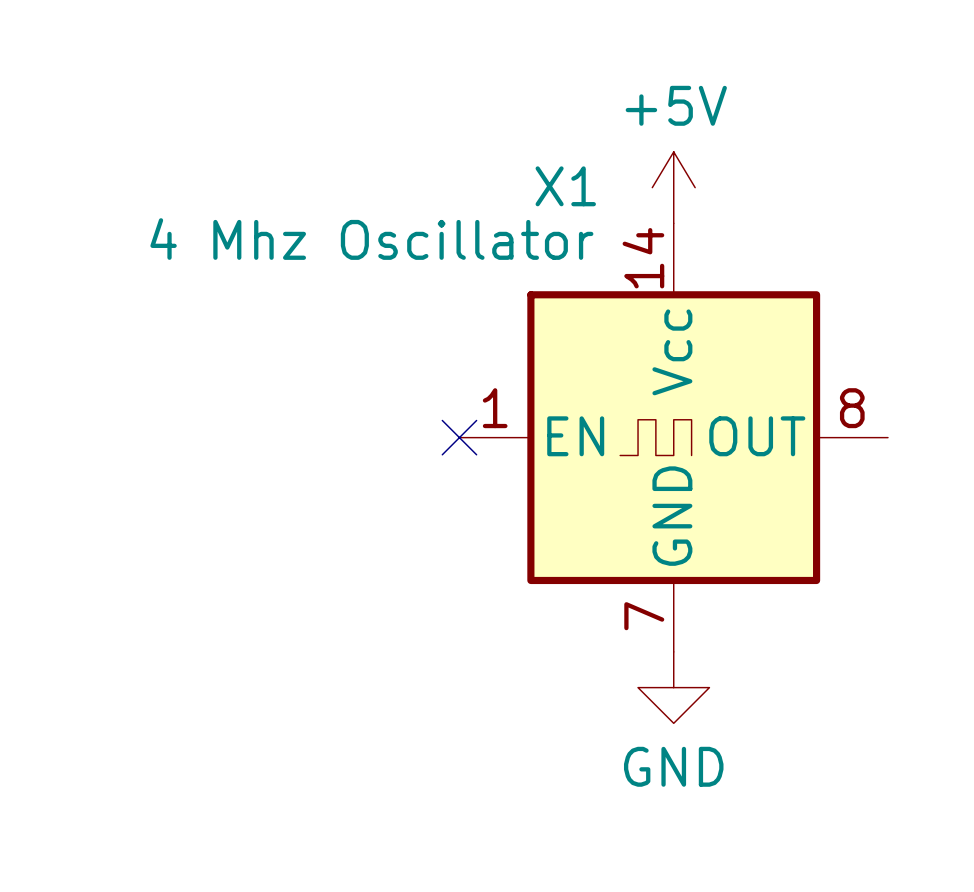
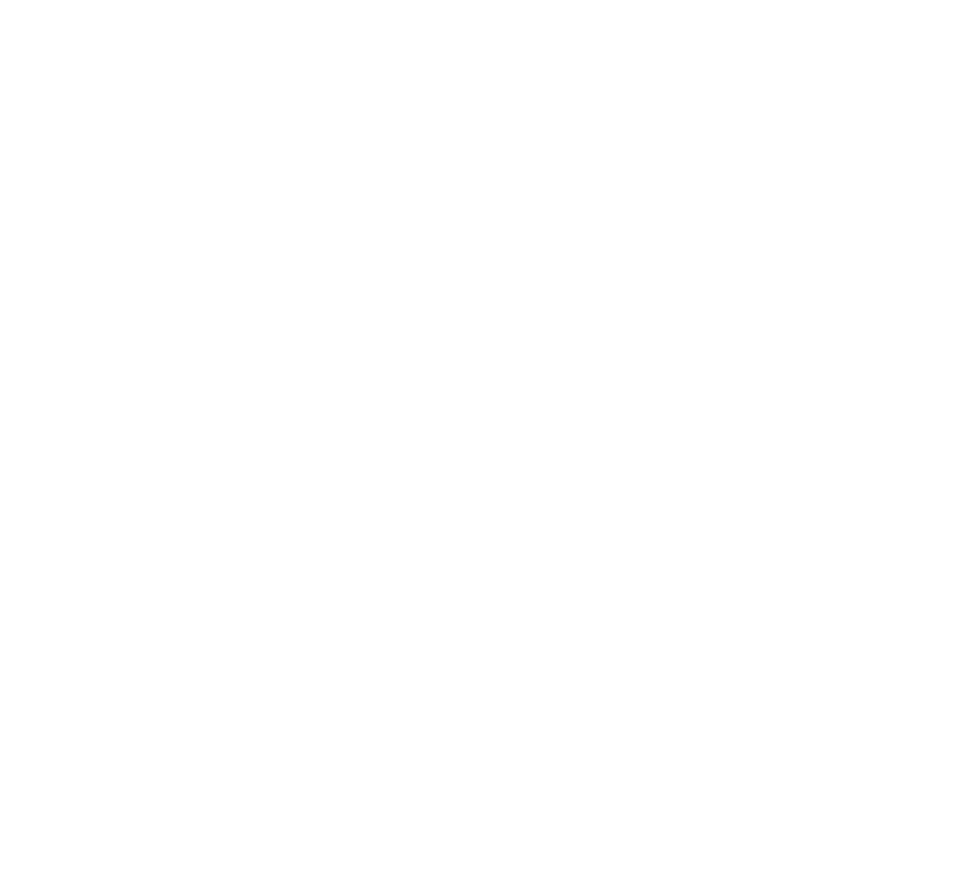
power symbol: +5V (673, 187) -> none
no-connect mark: (459, 437) -> none
X1: 4 Mhz Oscillator (673, 437) -> none
power symbol: GND (673, 687) -> none

